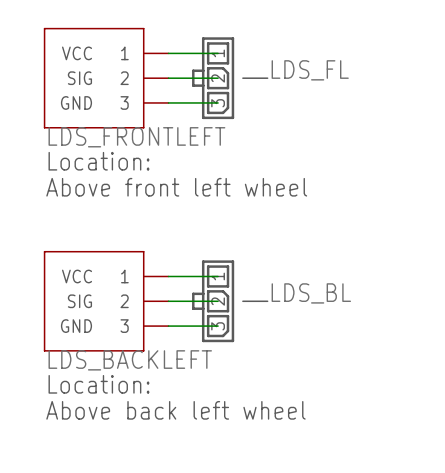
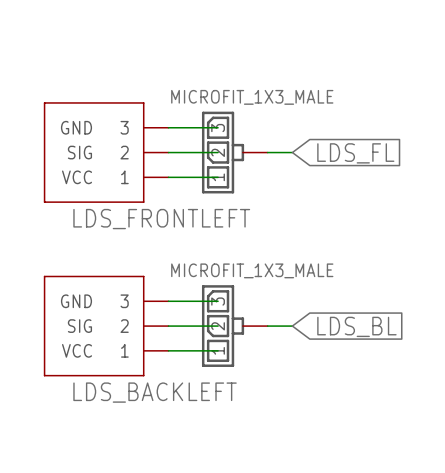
wire: (168, 53) (218, 53) -> (168, 127) (218, 127)
label: LDS_FL (310, 70) -> none
LDS_FRONTLEFT: (106, 78) -> none
wire: (168, 78) (218, 78) -> (168, 152) (218, 152)
part: (213, 78) -> none
bus: (242, 78) (267, 78) -> none
wire: (168, 102) (218, 102) -> (168, 177) (218, 177)
LDS_FRONTLEFT: none -> (106, 152)
part: none -> MICROFIT_1X3_MALE (234, 152)
wire: none -> (267, 152) (292, 152)
global label: none -> LDS_FL (355, 153)
text: Location: (99, 161) -> none
text: Above front left wheel (176, 187) -> none
wire: (168, 276) (218, 276) -> (168, 350) (218, 350)
label: LDS_BL (311, 293) -> none
LDS_BACKLEFT: (106, 301) -> none
part: (213, 301) -> none
bus: (242, 301) (267, 301) -> none
LDS_BACKLEFT: none -> (106, 326)
part: none -> MICROFIT_1X3_MALE (234, 326)
wire: none -> (267, 326) (292, 326)
global label: none -> LDS_BL (356, 326)
text: Location: (99, 384) -> none
text: Above back left wheel (175, 410) -> none

